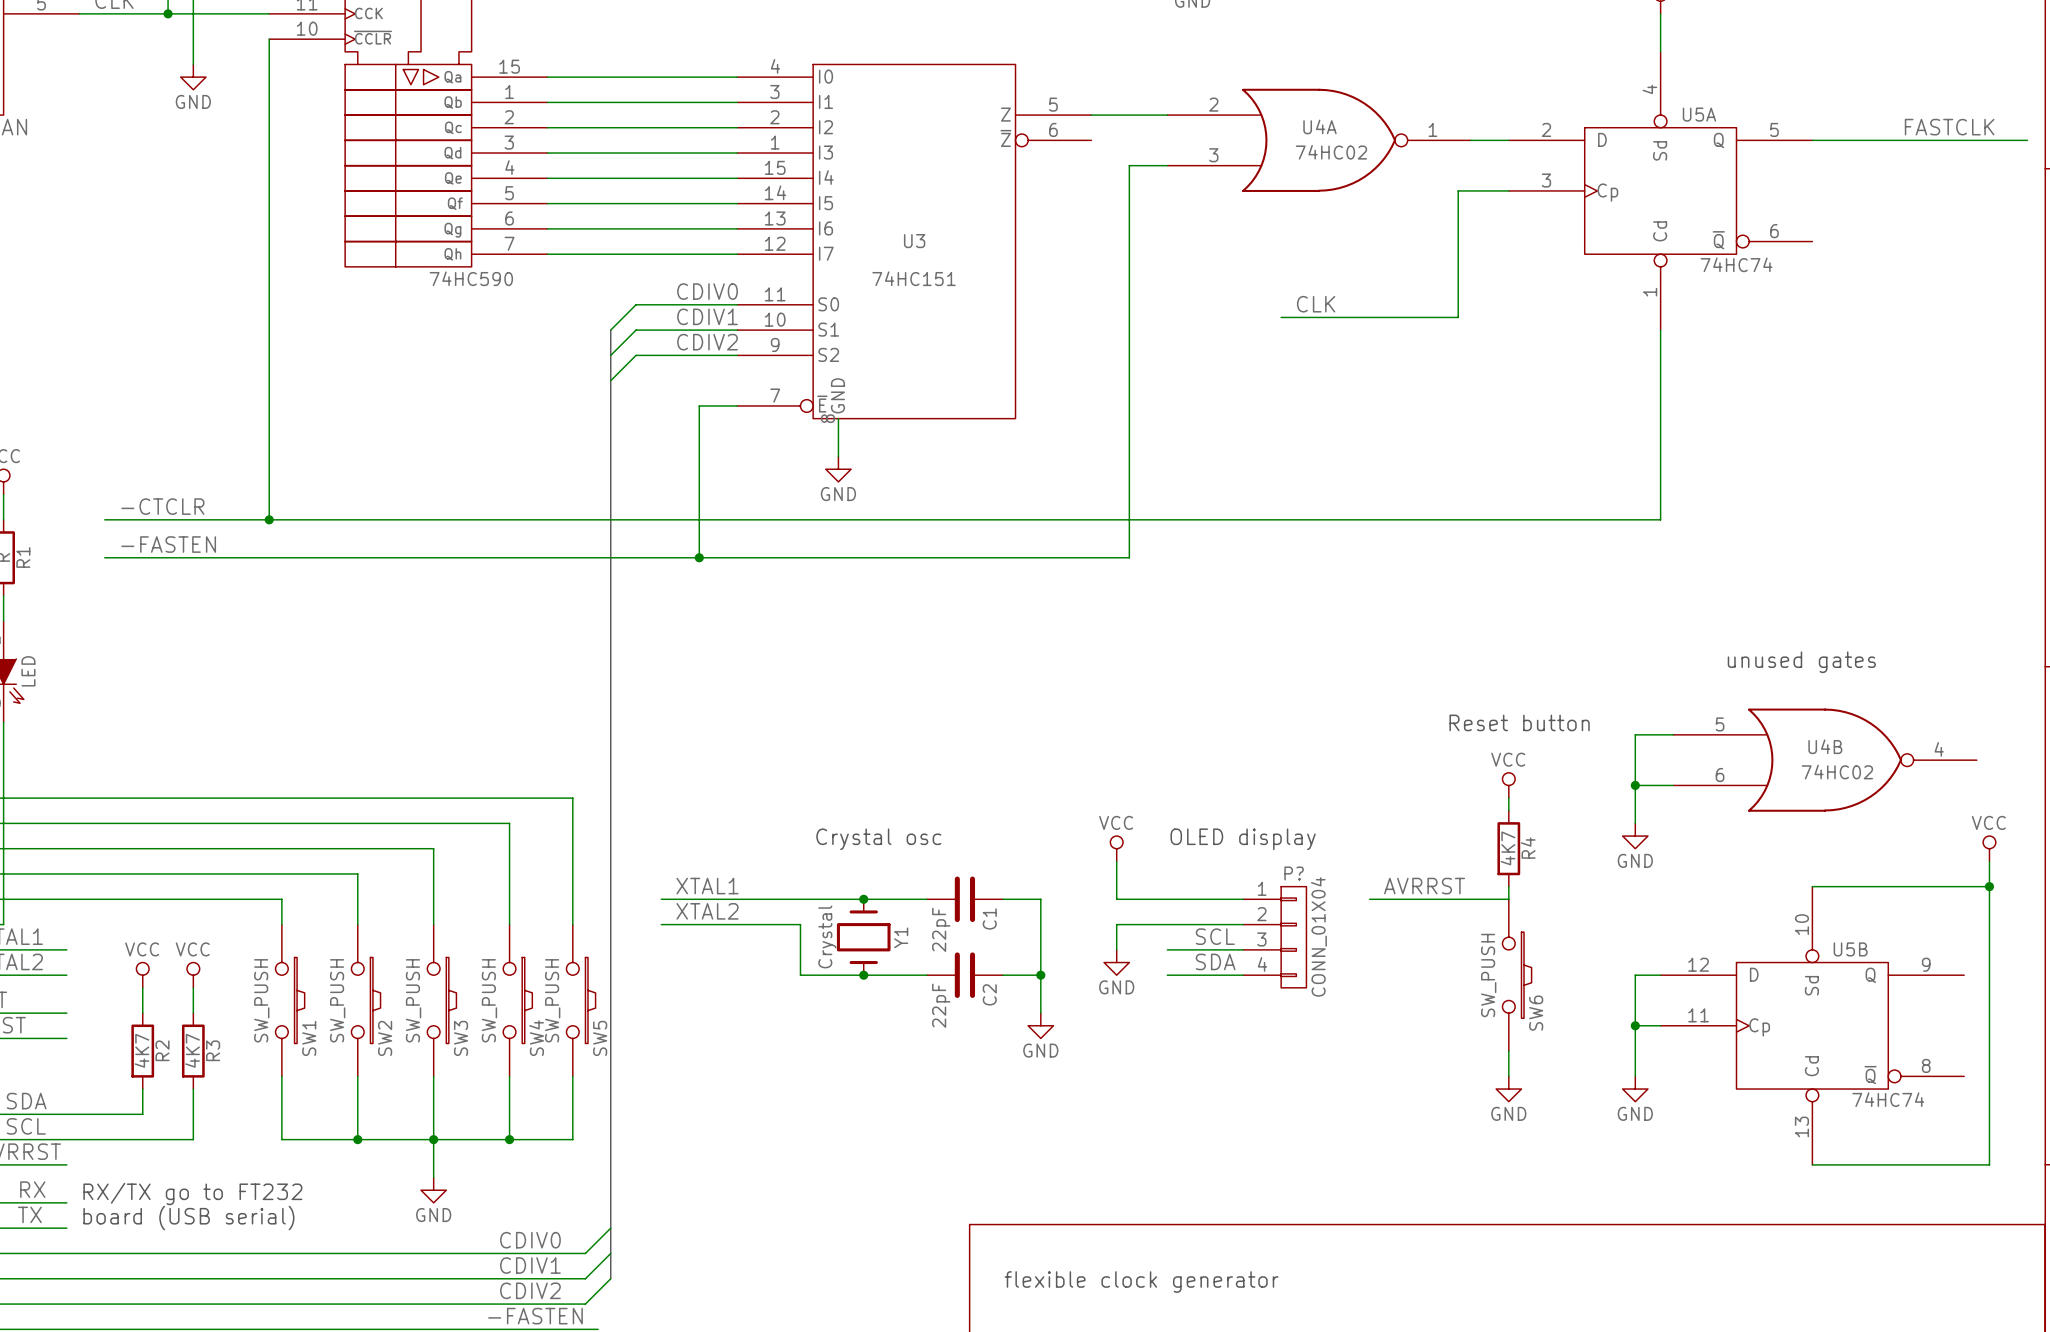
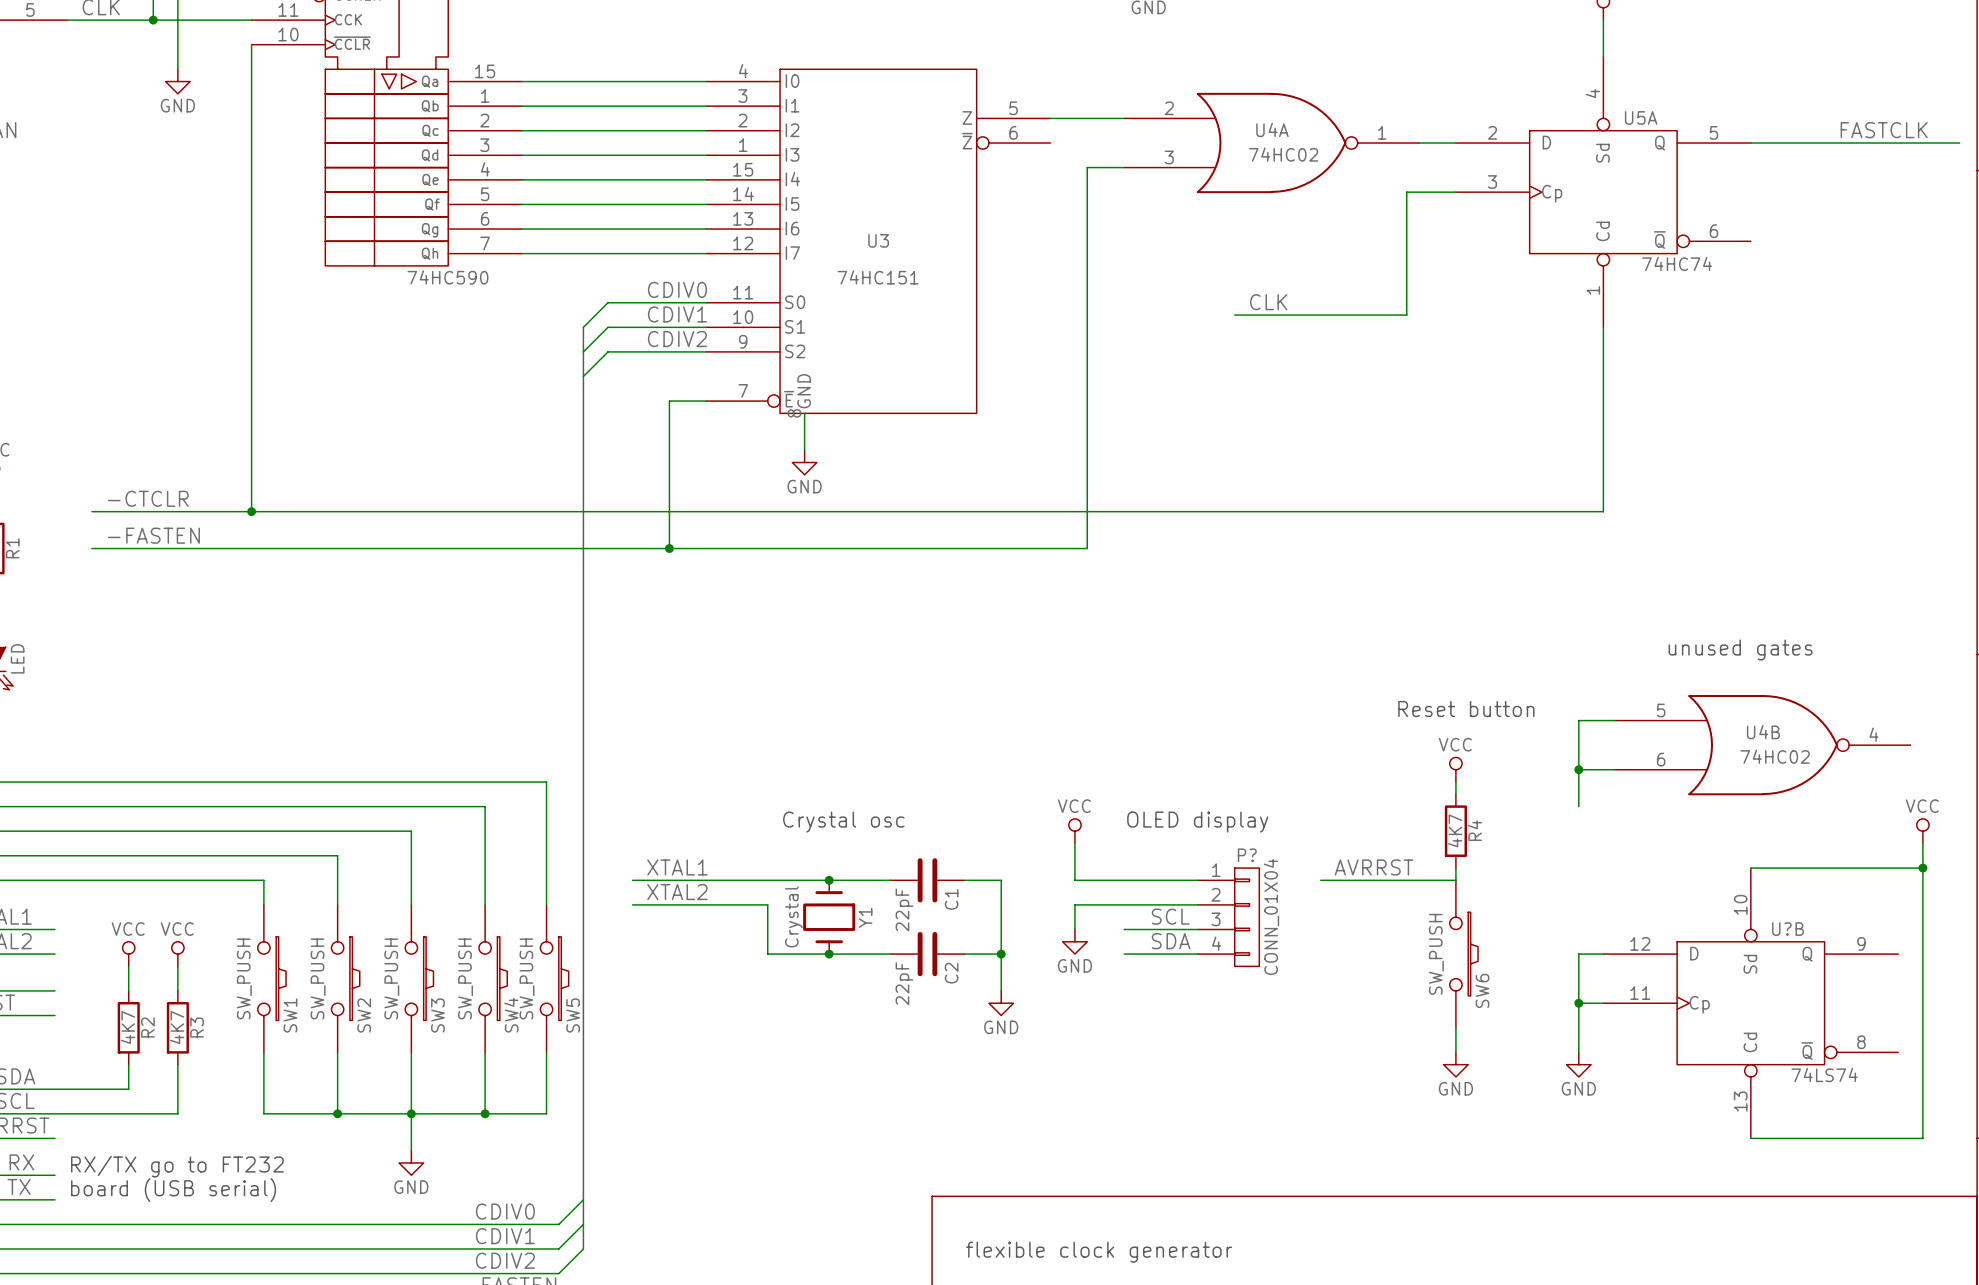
power symbol: GND (1635, 836) -> none
U5B name: U5B (1850, 949) -> U?B (1788, 929)
U5B value: 74HC74 (1888, 1099) -> 74LS74 (1824, 1074)

